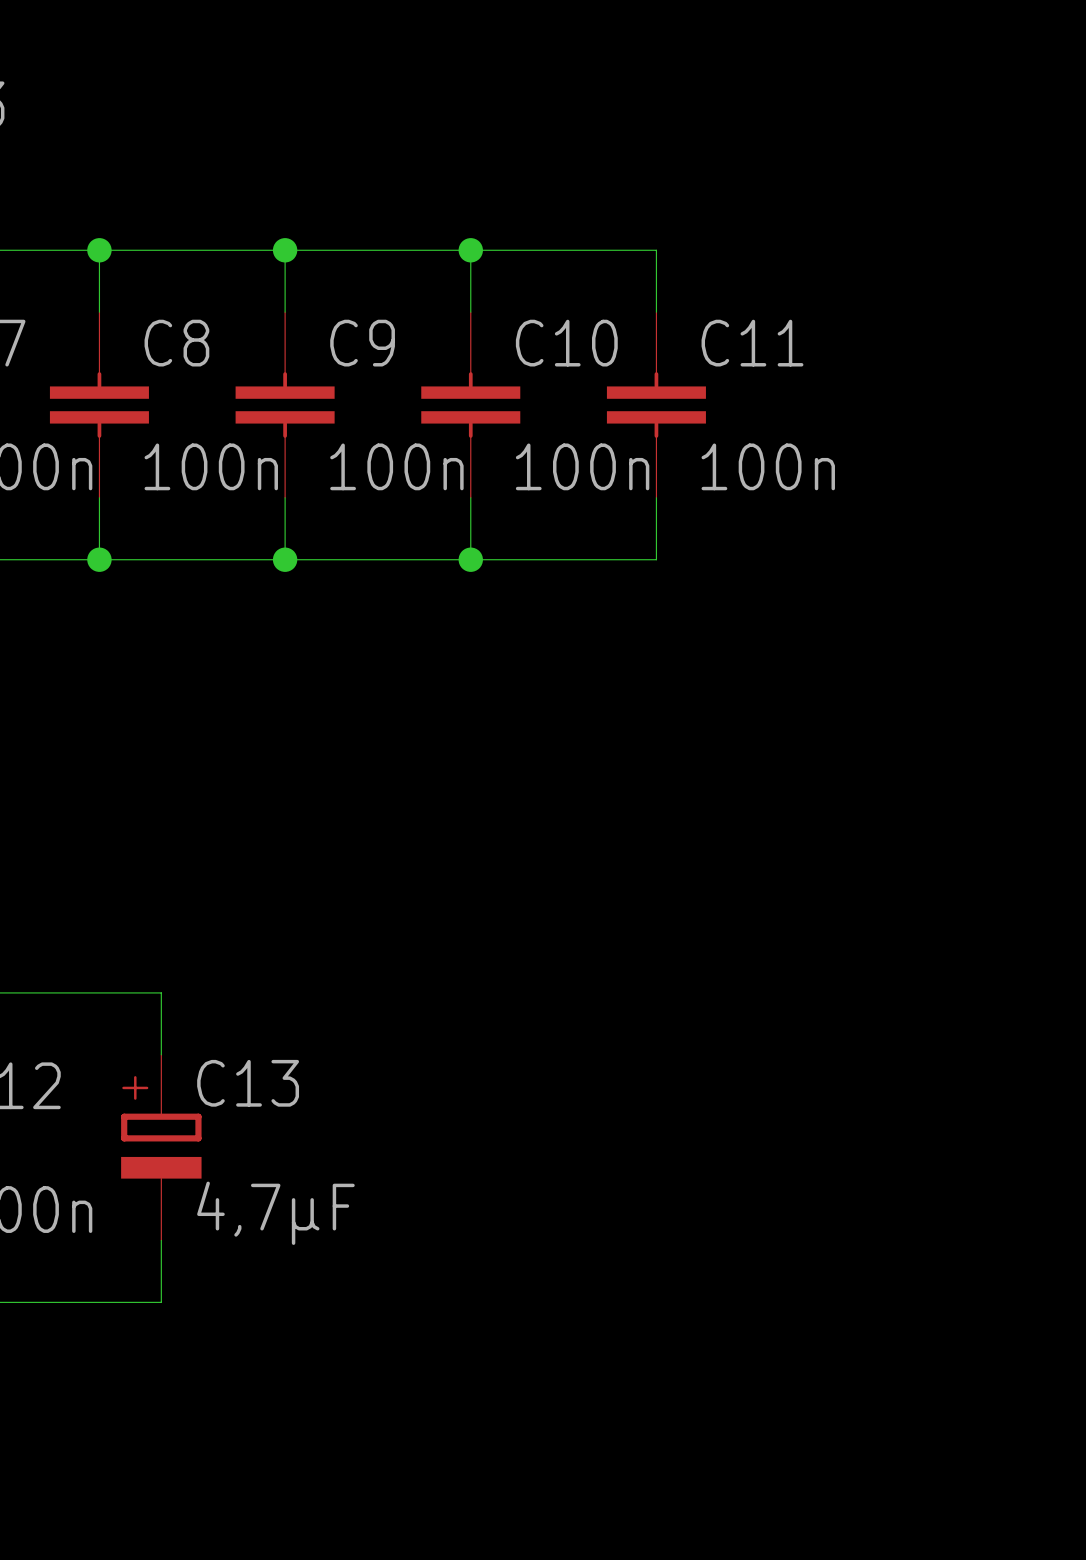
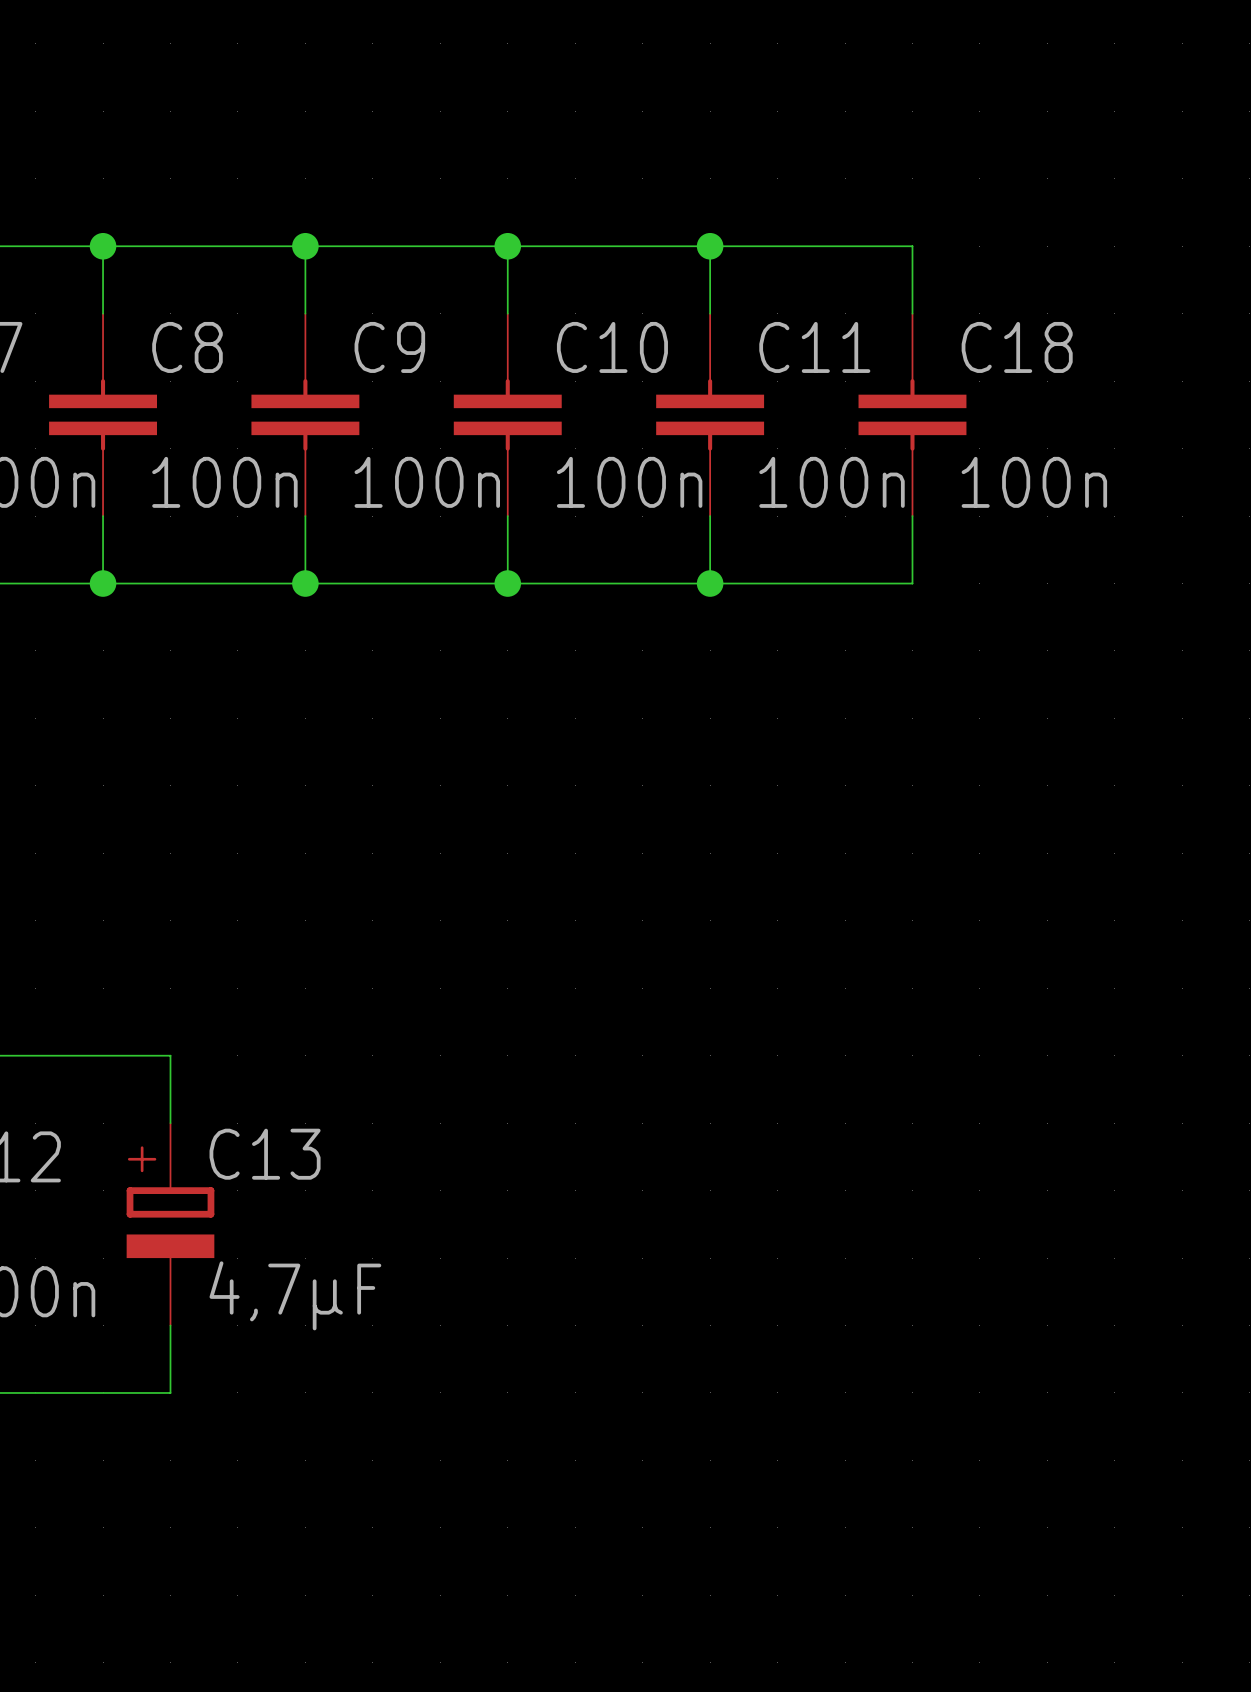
wire: none -> (710, 246) (912, 246) (912, 313)
junction: none -> (710, 246)
C18: none -> 100n (912, 414)
wire: none -> (912, 516) (912, 583) (710, 583)
junction: none -> (710, 583)

